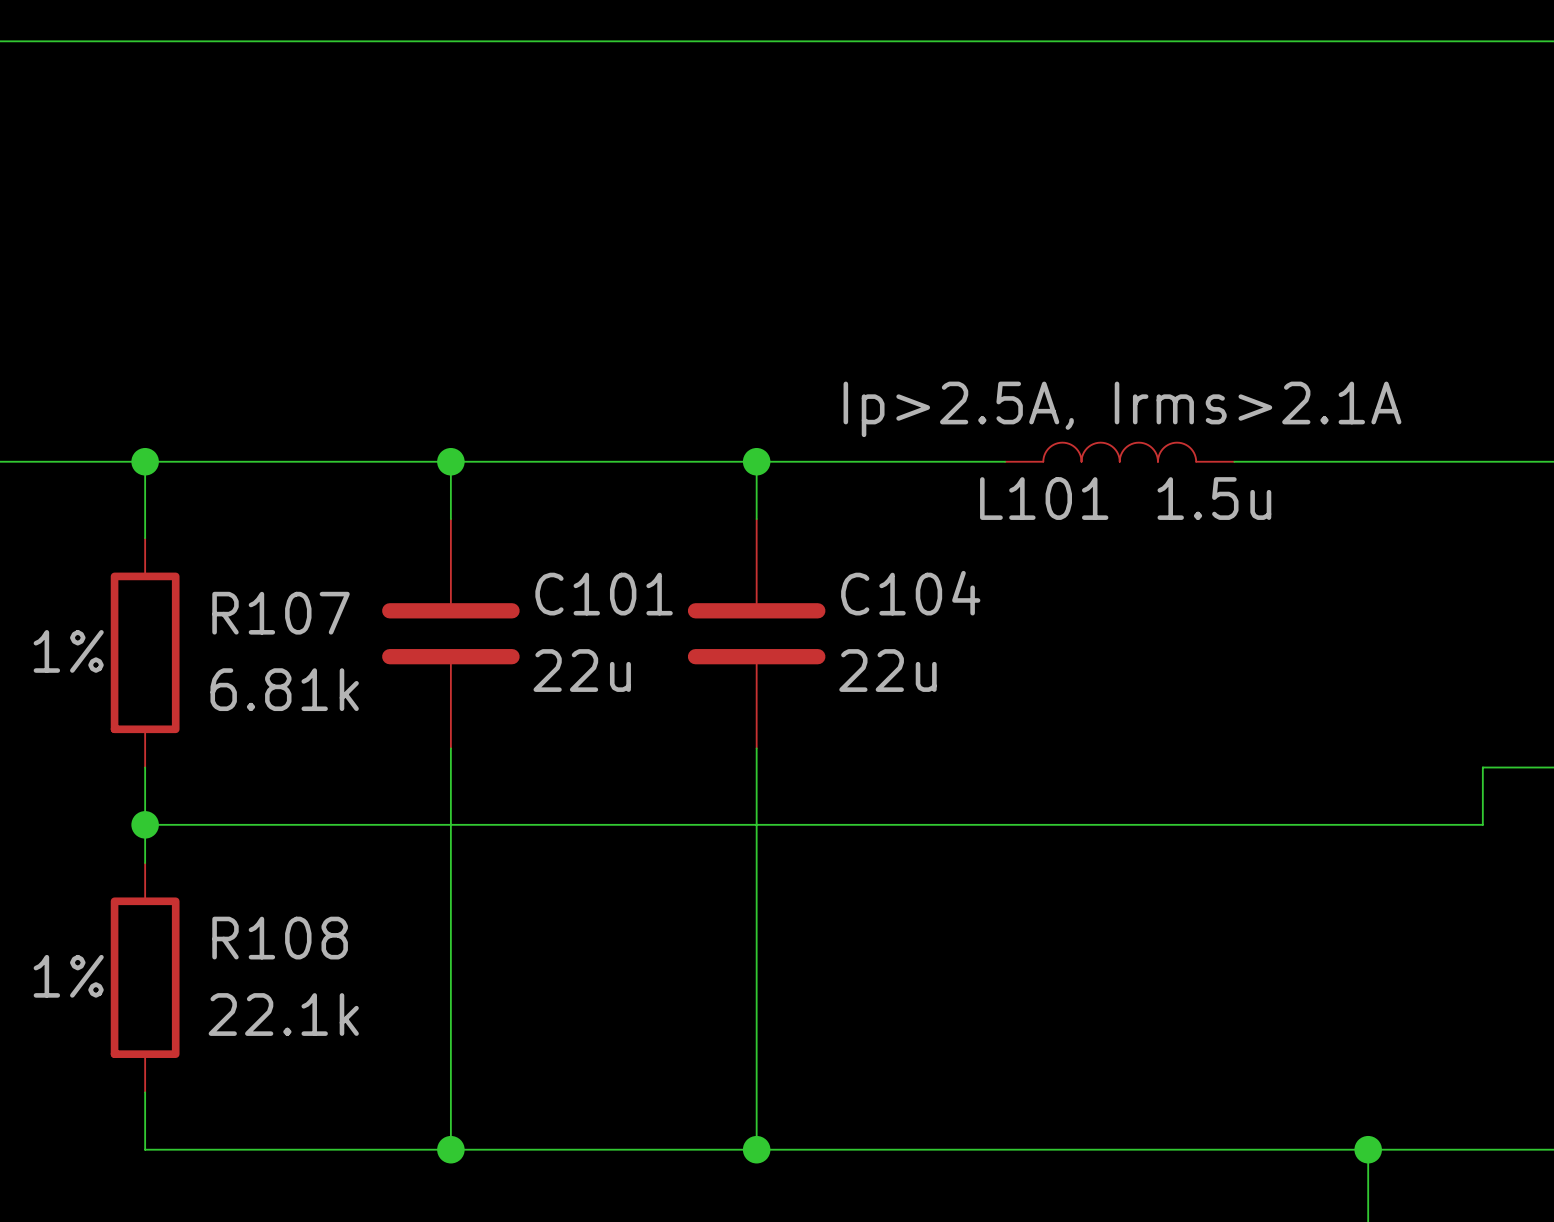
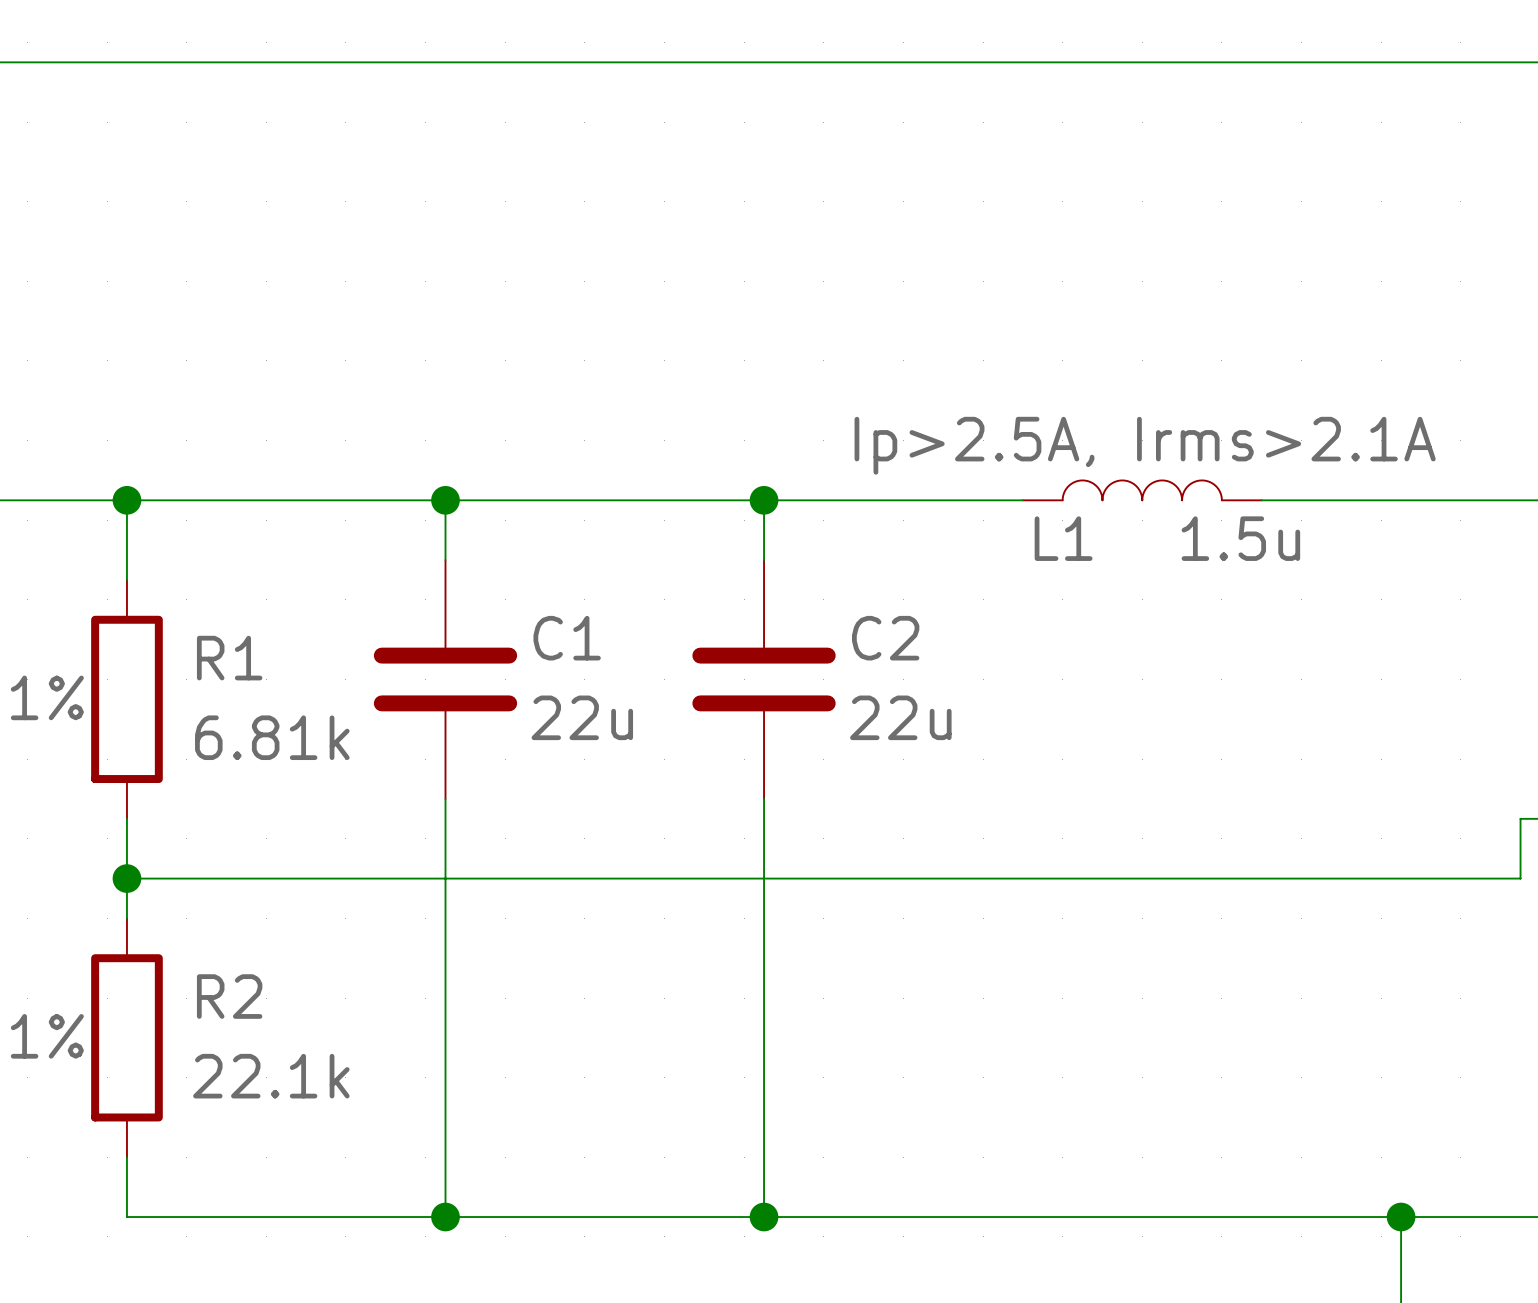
L101 name: L101 (1044, 498) -> L1 (1063, 538)
C104 name: C104 (910, 593) -> C2 (885, 638)
C101 name: C101 (604, 594) -> C1 (567, 638)
R107 name: R107 (281, 613) -> R1 (229, 658)
R108 name: R108 (280, 938) -> R2 (229, 996)

